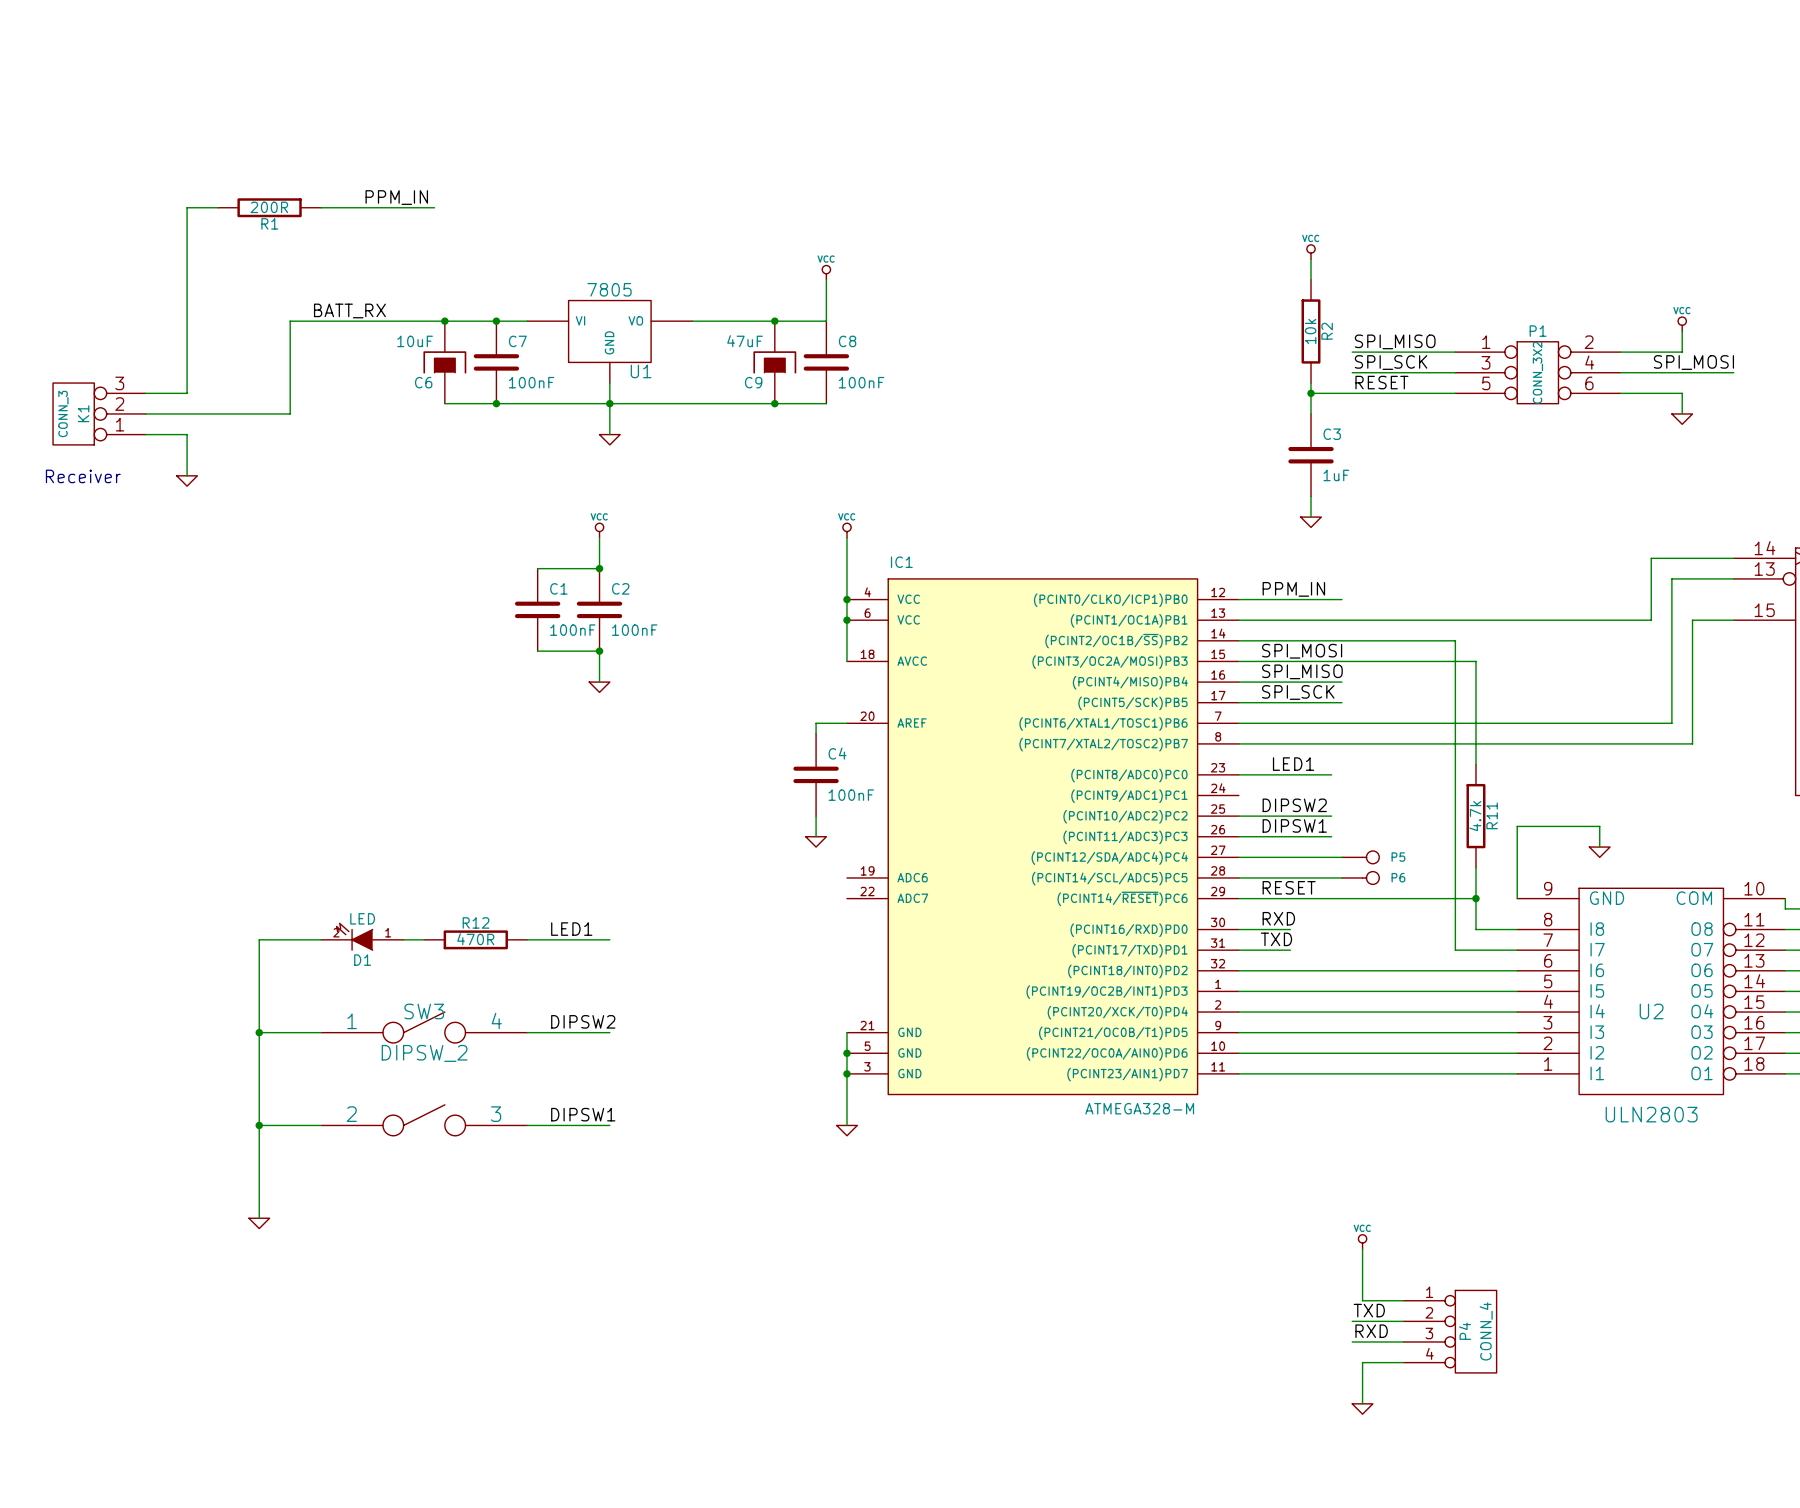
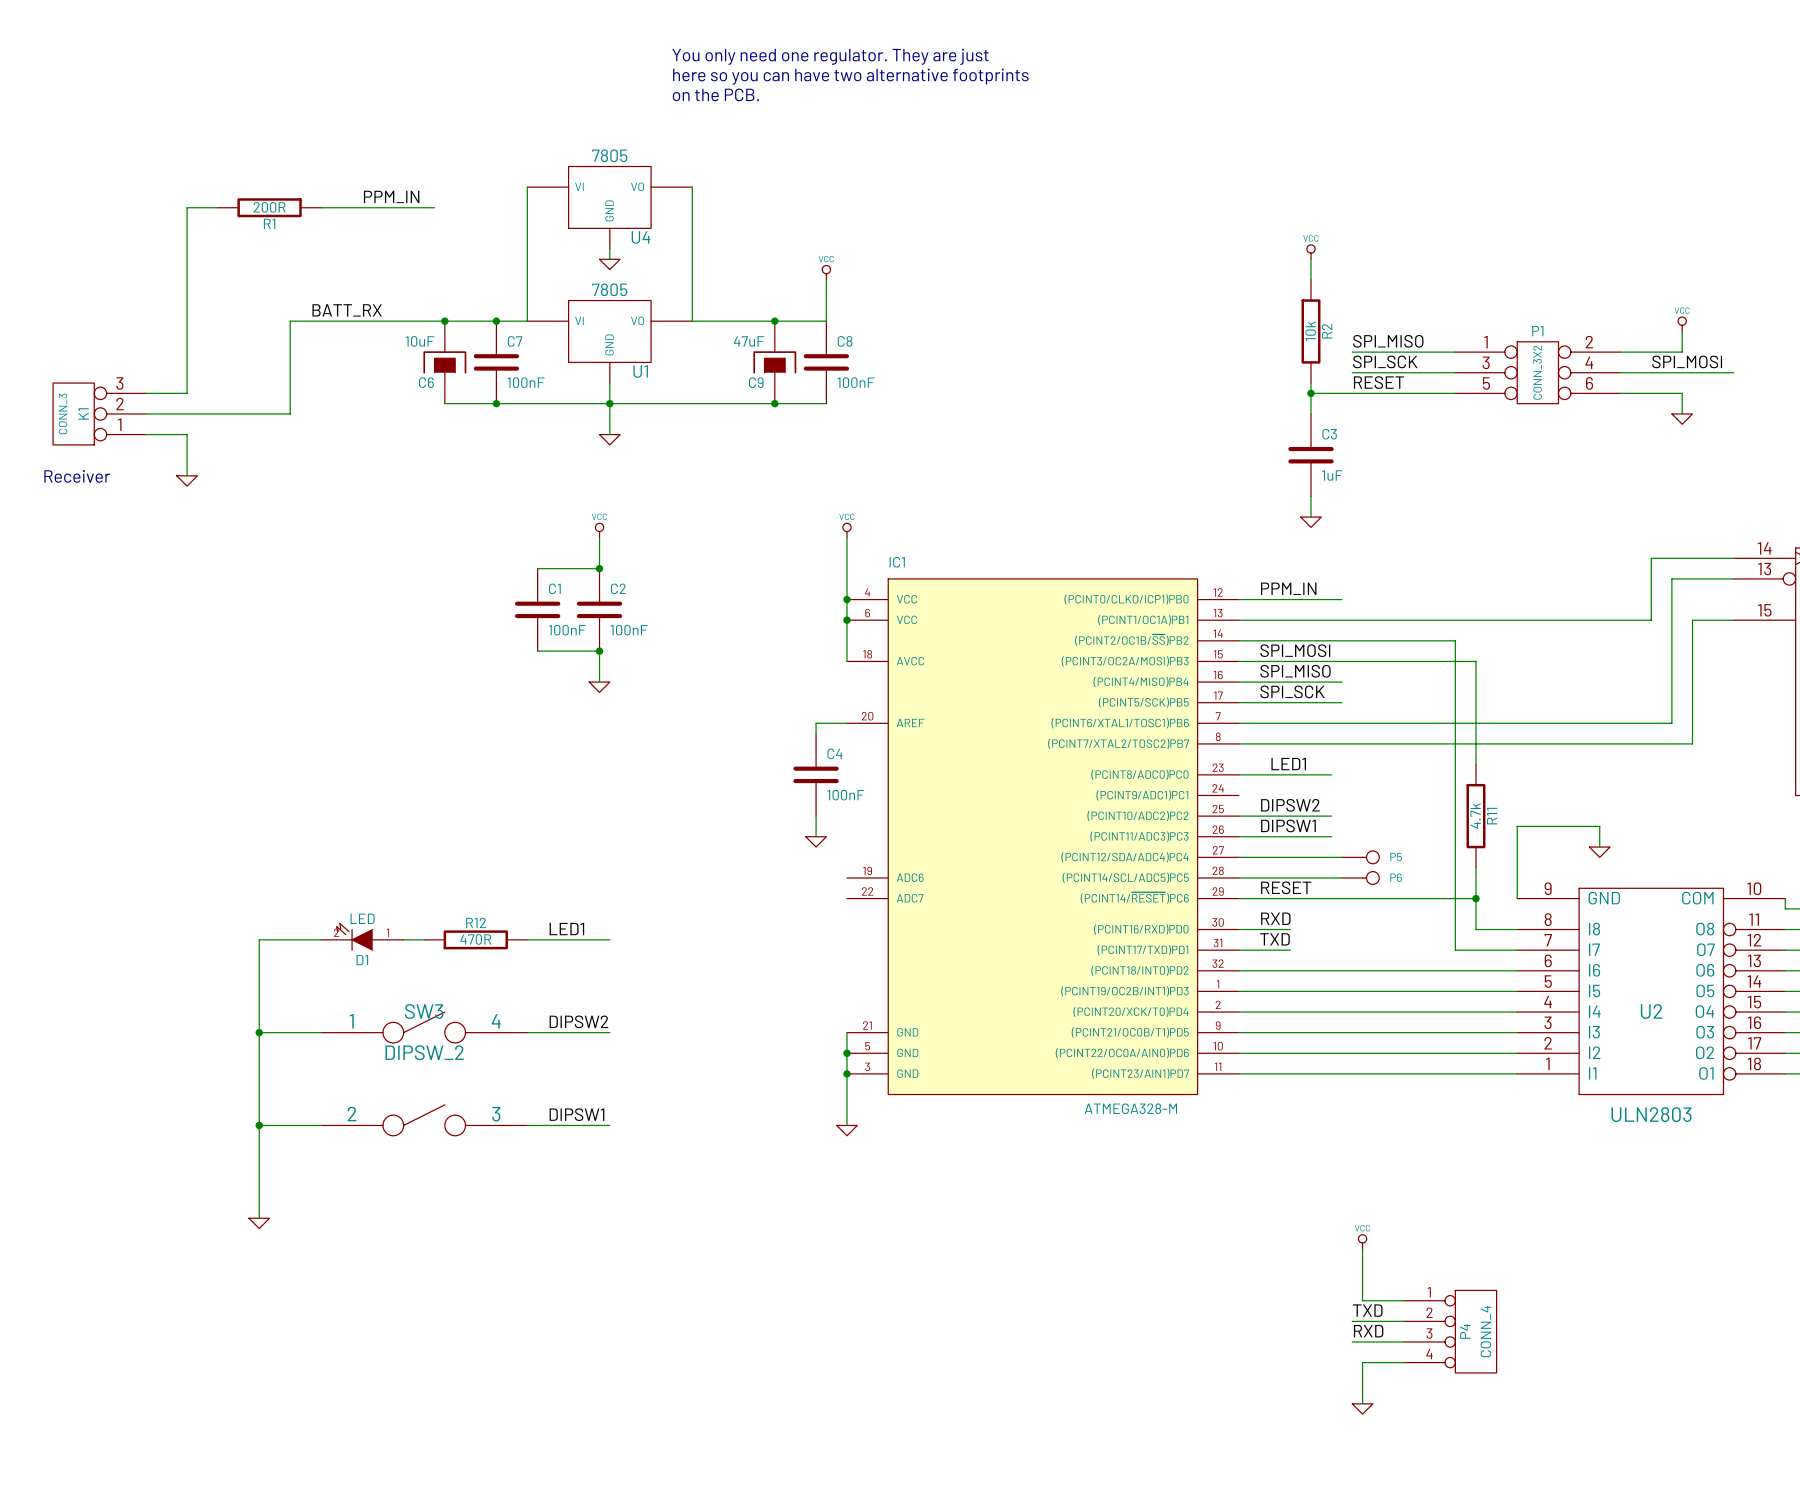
text: none -> You only need one regulator. They are just (830, 56)
text: none -> here so you can have two alternative footprints (850, 76)
text: none -> on the PCB. (715, 94)
wire: none -> (527, 187) (527, 321)
wire: none -> (692, 187) (692, 321)
U4: none -> 7805 (609, 207)
wire: none -> (609, 248) (609, 259)
power symbol: none -> (609, 264)

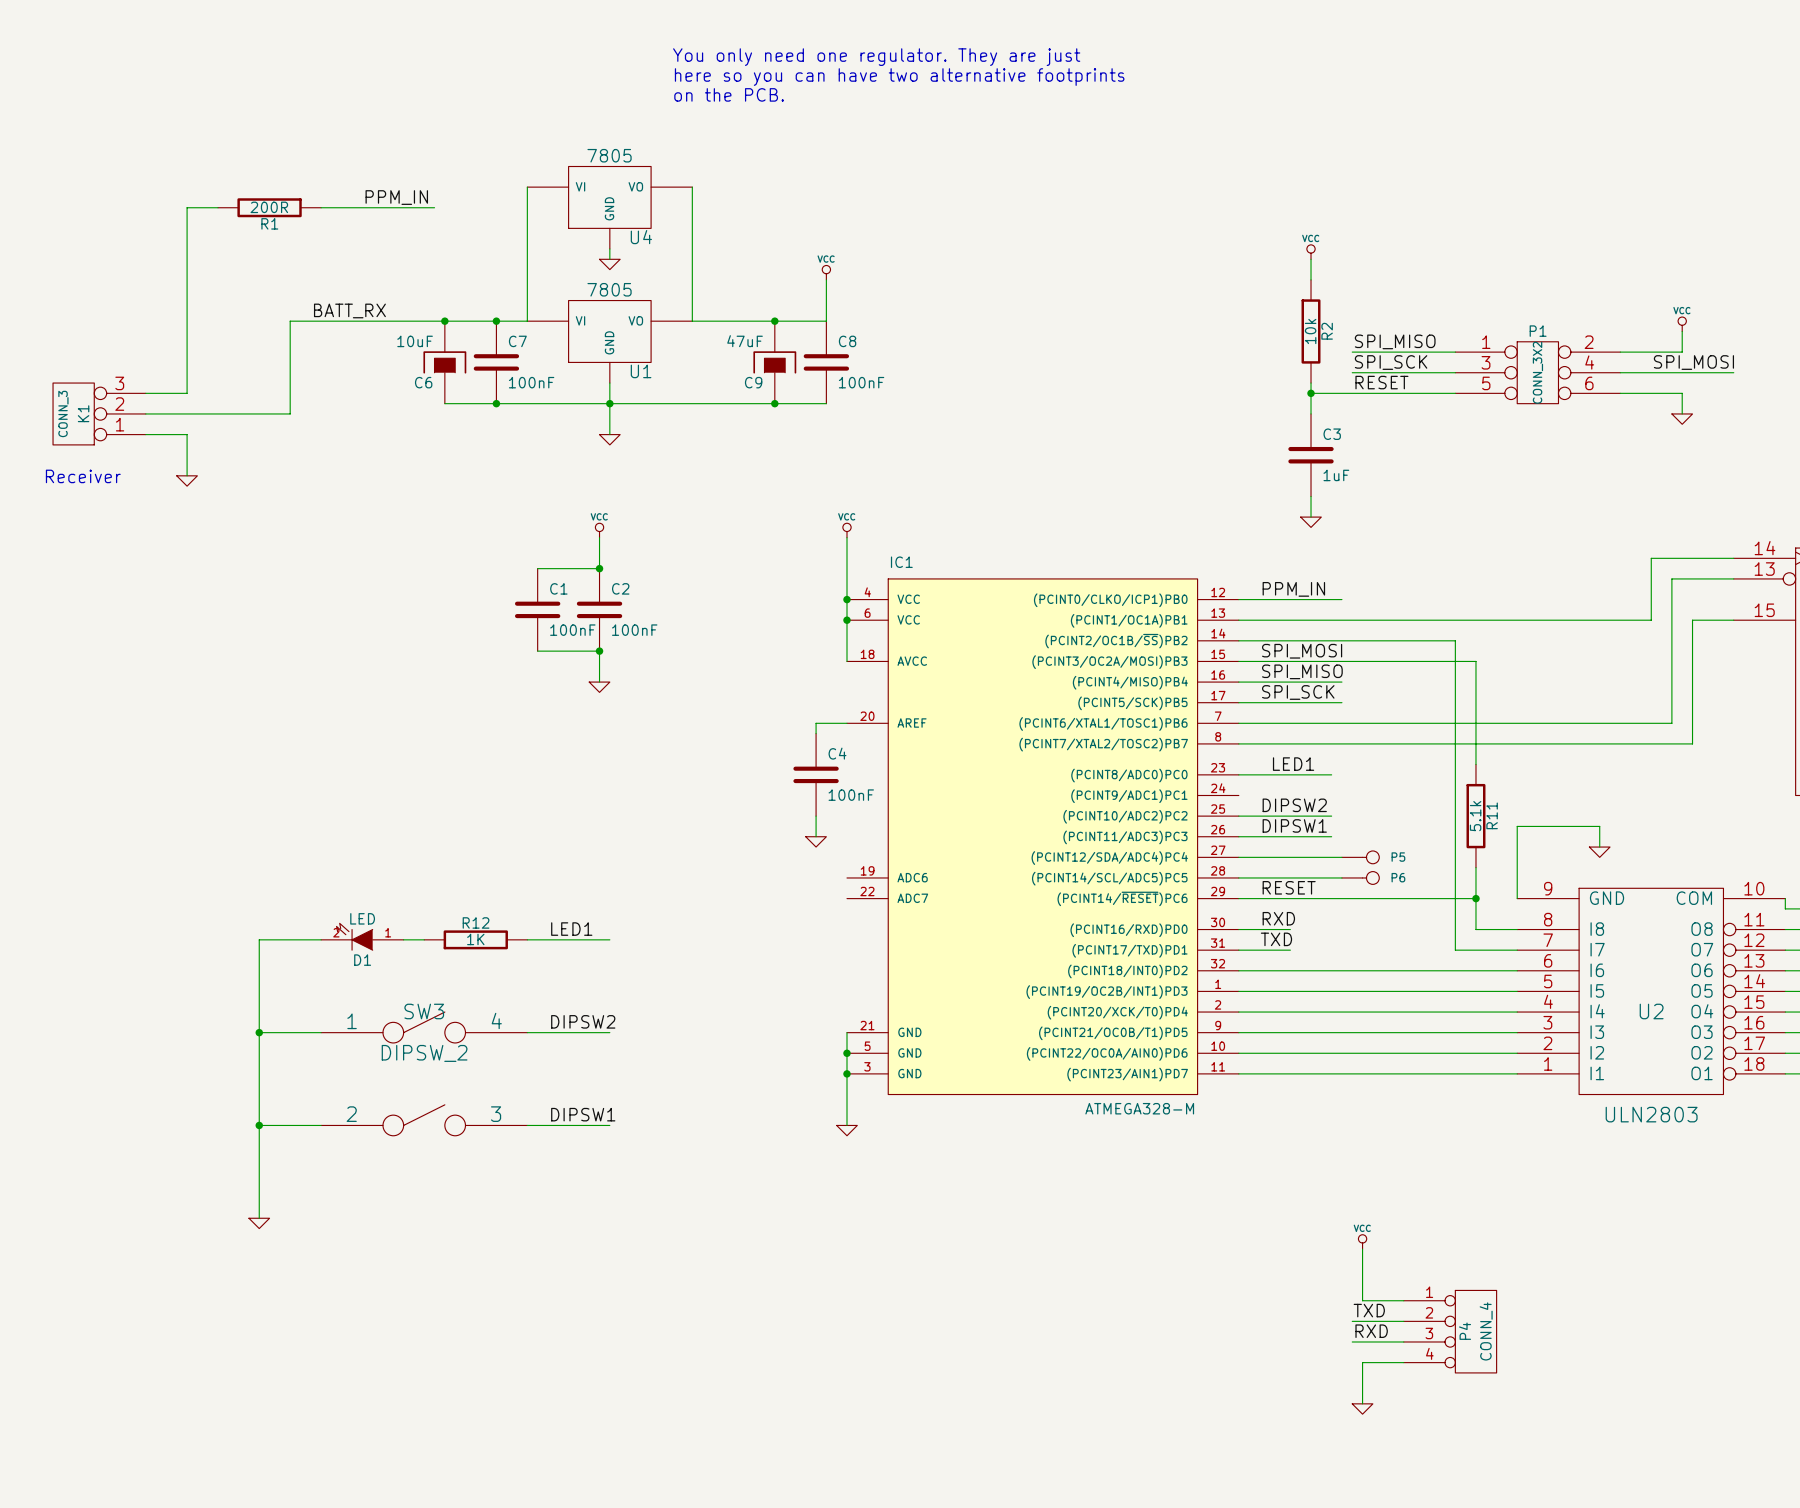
R11 value: 4.7k (1475, 815) -> 5.1k (1475, 816)
R12 value: 470R (475, 939) -> 1K (475, 939)

